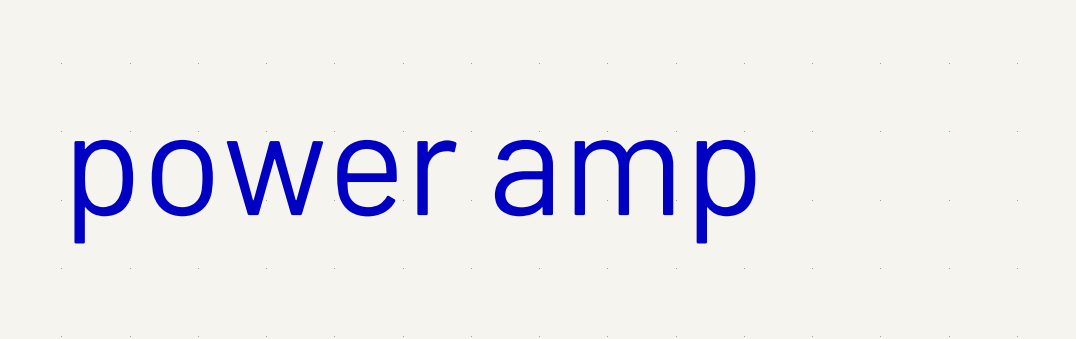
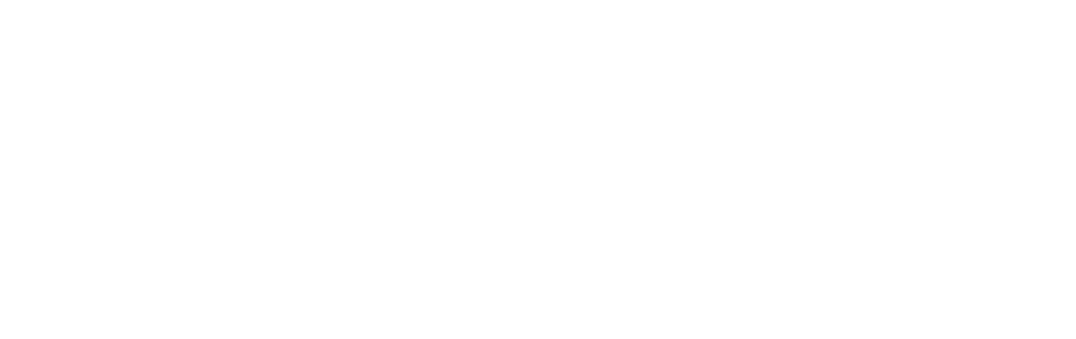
text: power amp (414, 191) -> none

